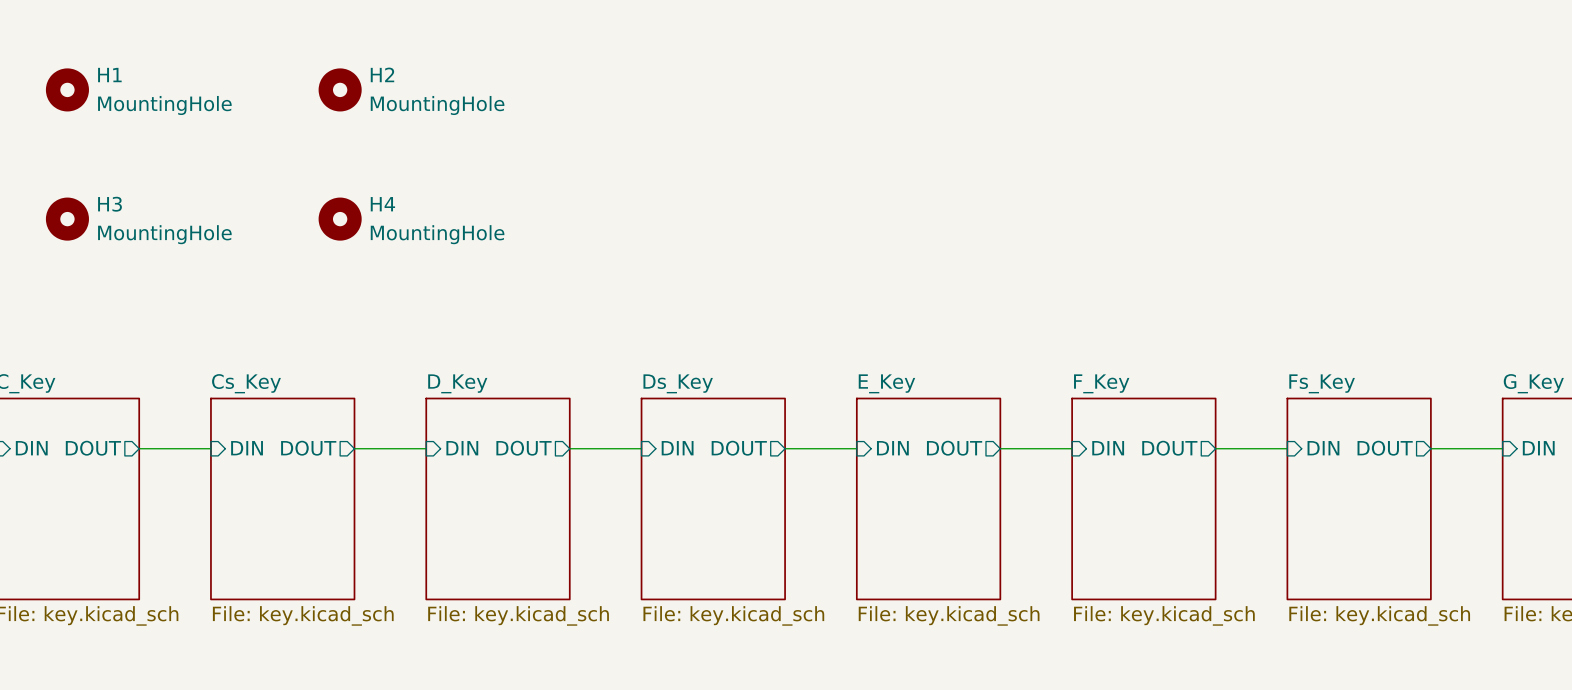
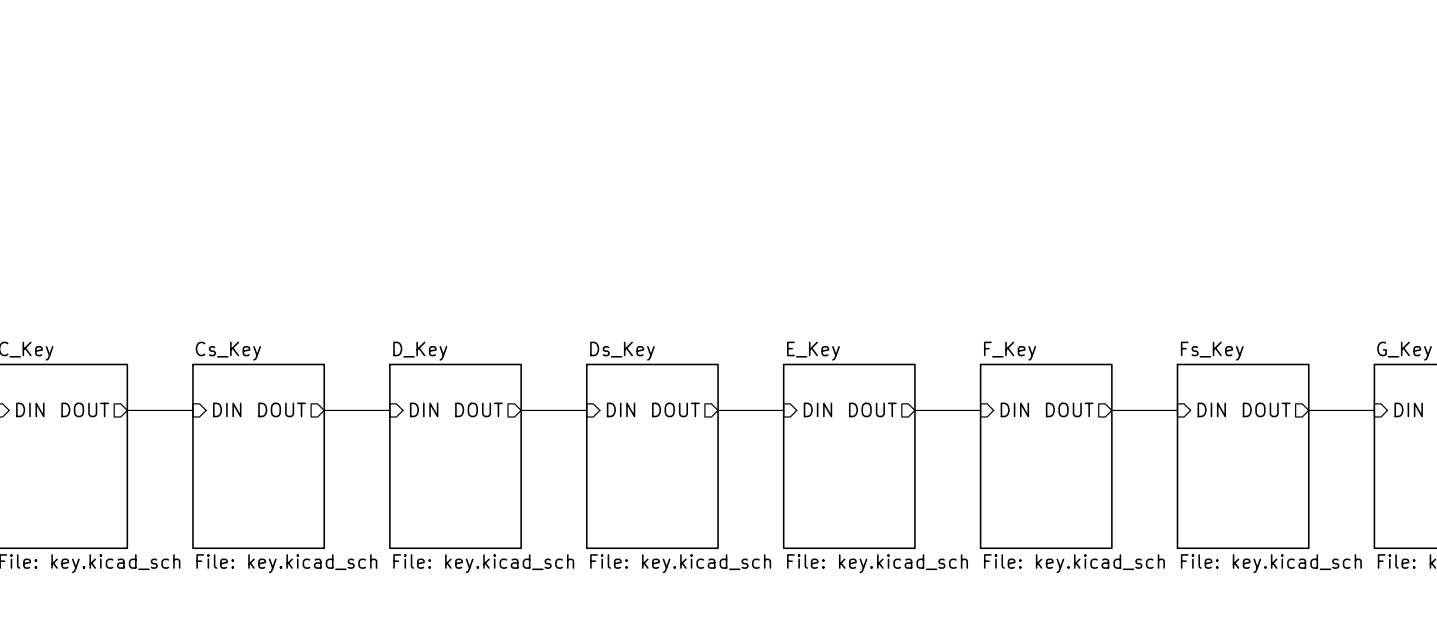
H1: MountingHole (67, 89) -> none
H2: MountingHole (340, 89) -> none
H3: MountingHole (67, 219) -> none
H4: MountingHole (340, 219) -> none

